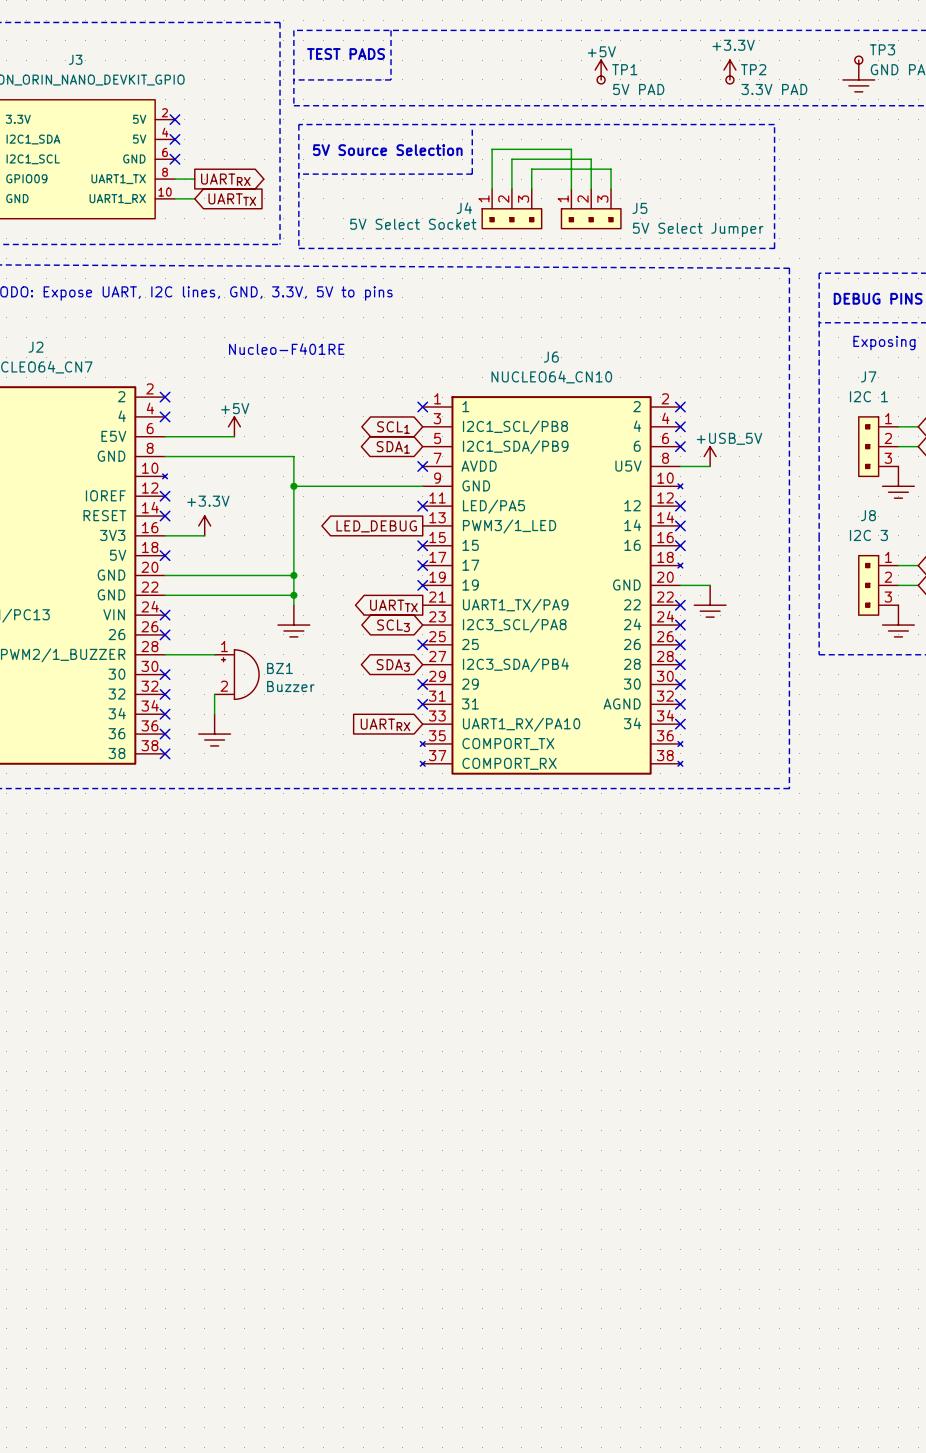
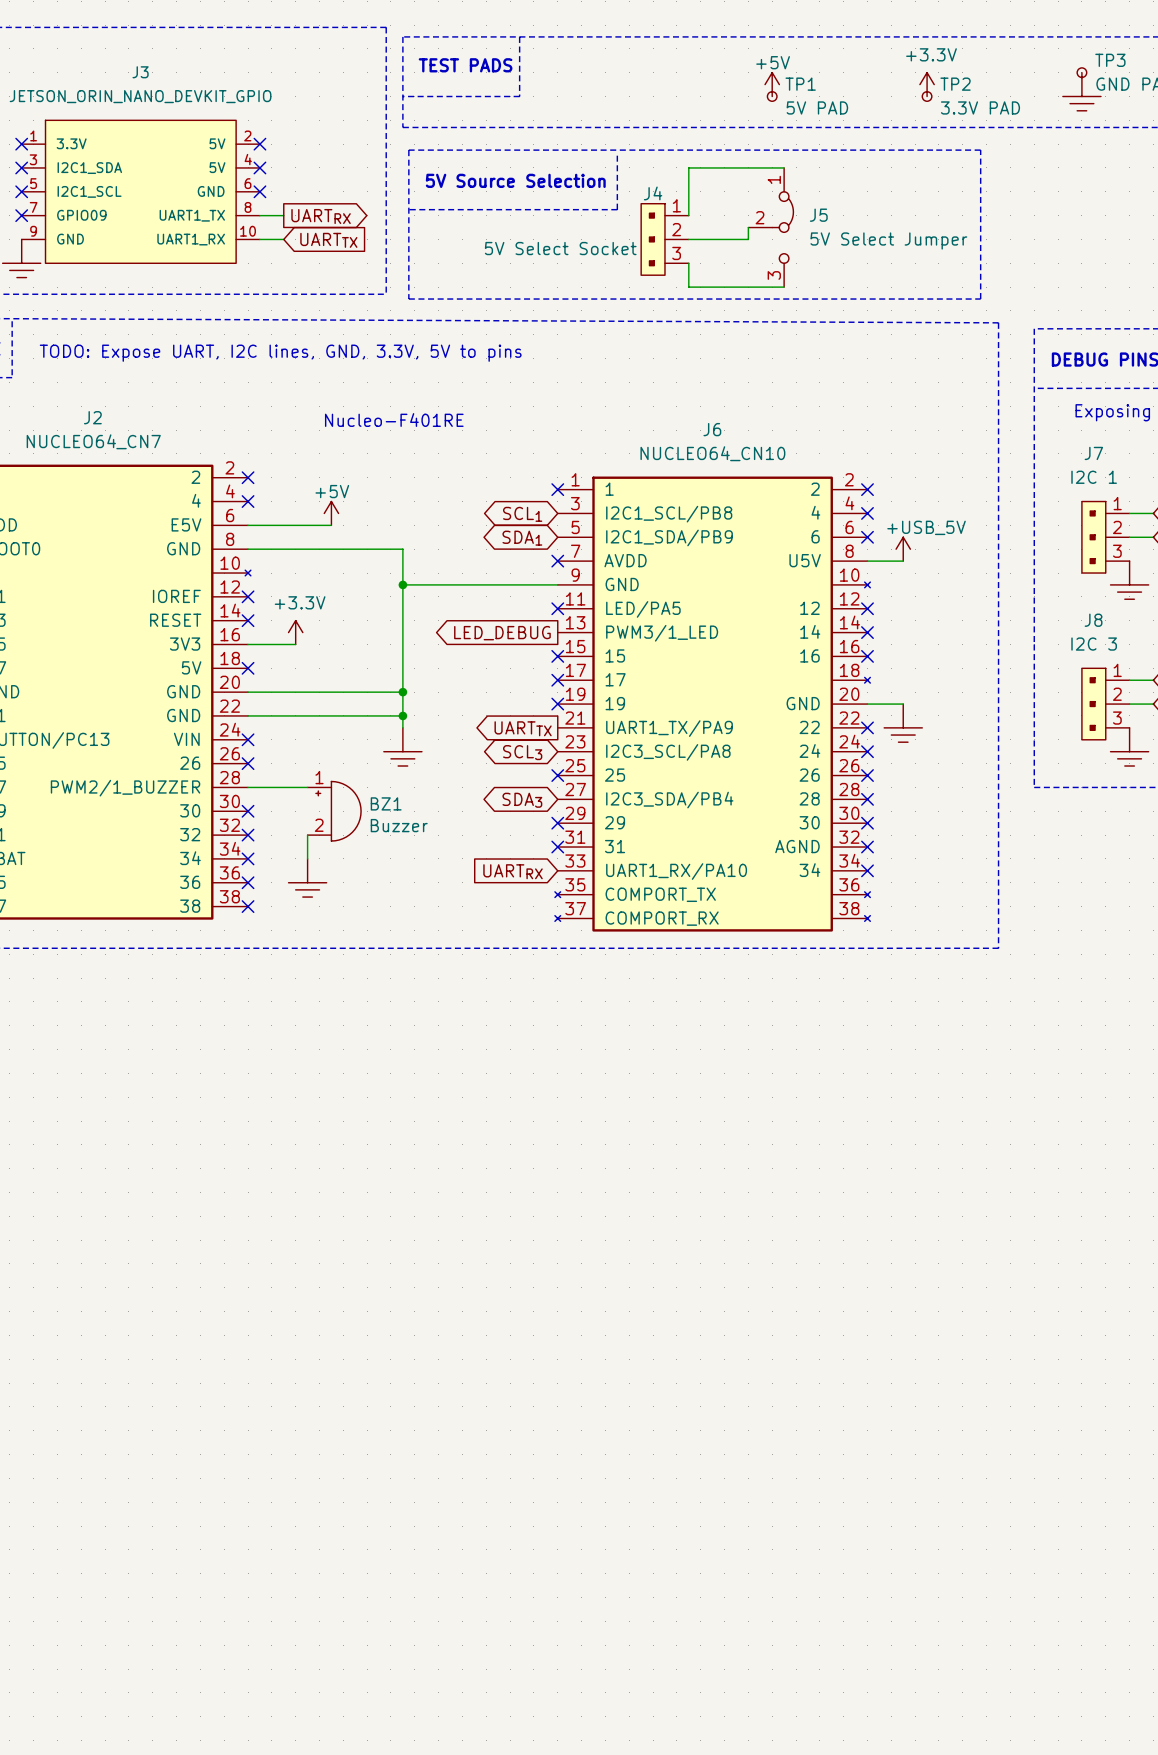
wire: (531, 169) (611, 169) (611, 188) -> (688, 203) (688, 167) (784, 167)
wire: (531, 179) (531, 188) -> none
wire: (492, 188) (492, 149) (571, 149) (571, 188) -> none
wire: (511, 188) (511, 159) (591, 159) (591, 188) -> none
J5 symbol: [561, 188, 621, 229] -> [748, 167, 794, 288]
wire: none -> (748, 227) (748, 239) (688, 239)
J4 rotation: 0° (511, 218) -> 90° clockwise (653, 239)
wire: none -> (688, 263) (688, 287) (784, 287)

